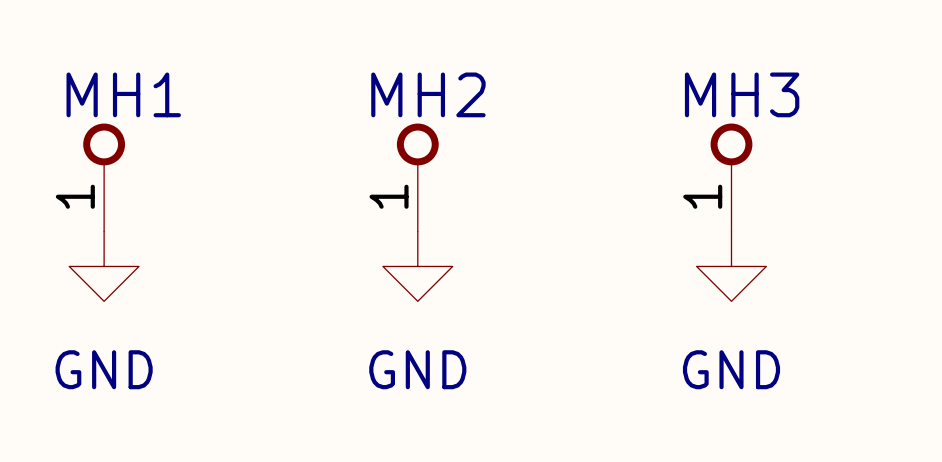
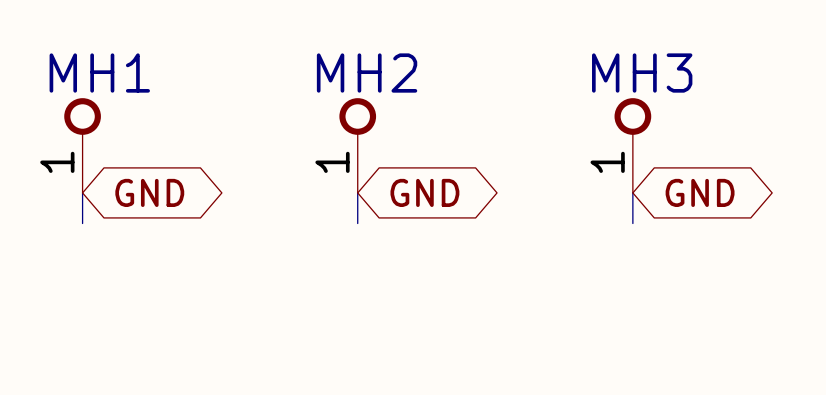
global label: none -> GND (149, 192)
global label: none -> GND (424, 192)
global label: none -> GND (700, 192)
power symbol: GND (104, 266) -> none
power symbol: GND (417, 266) -> none
power symbol: GND (731, 266) -> none

